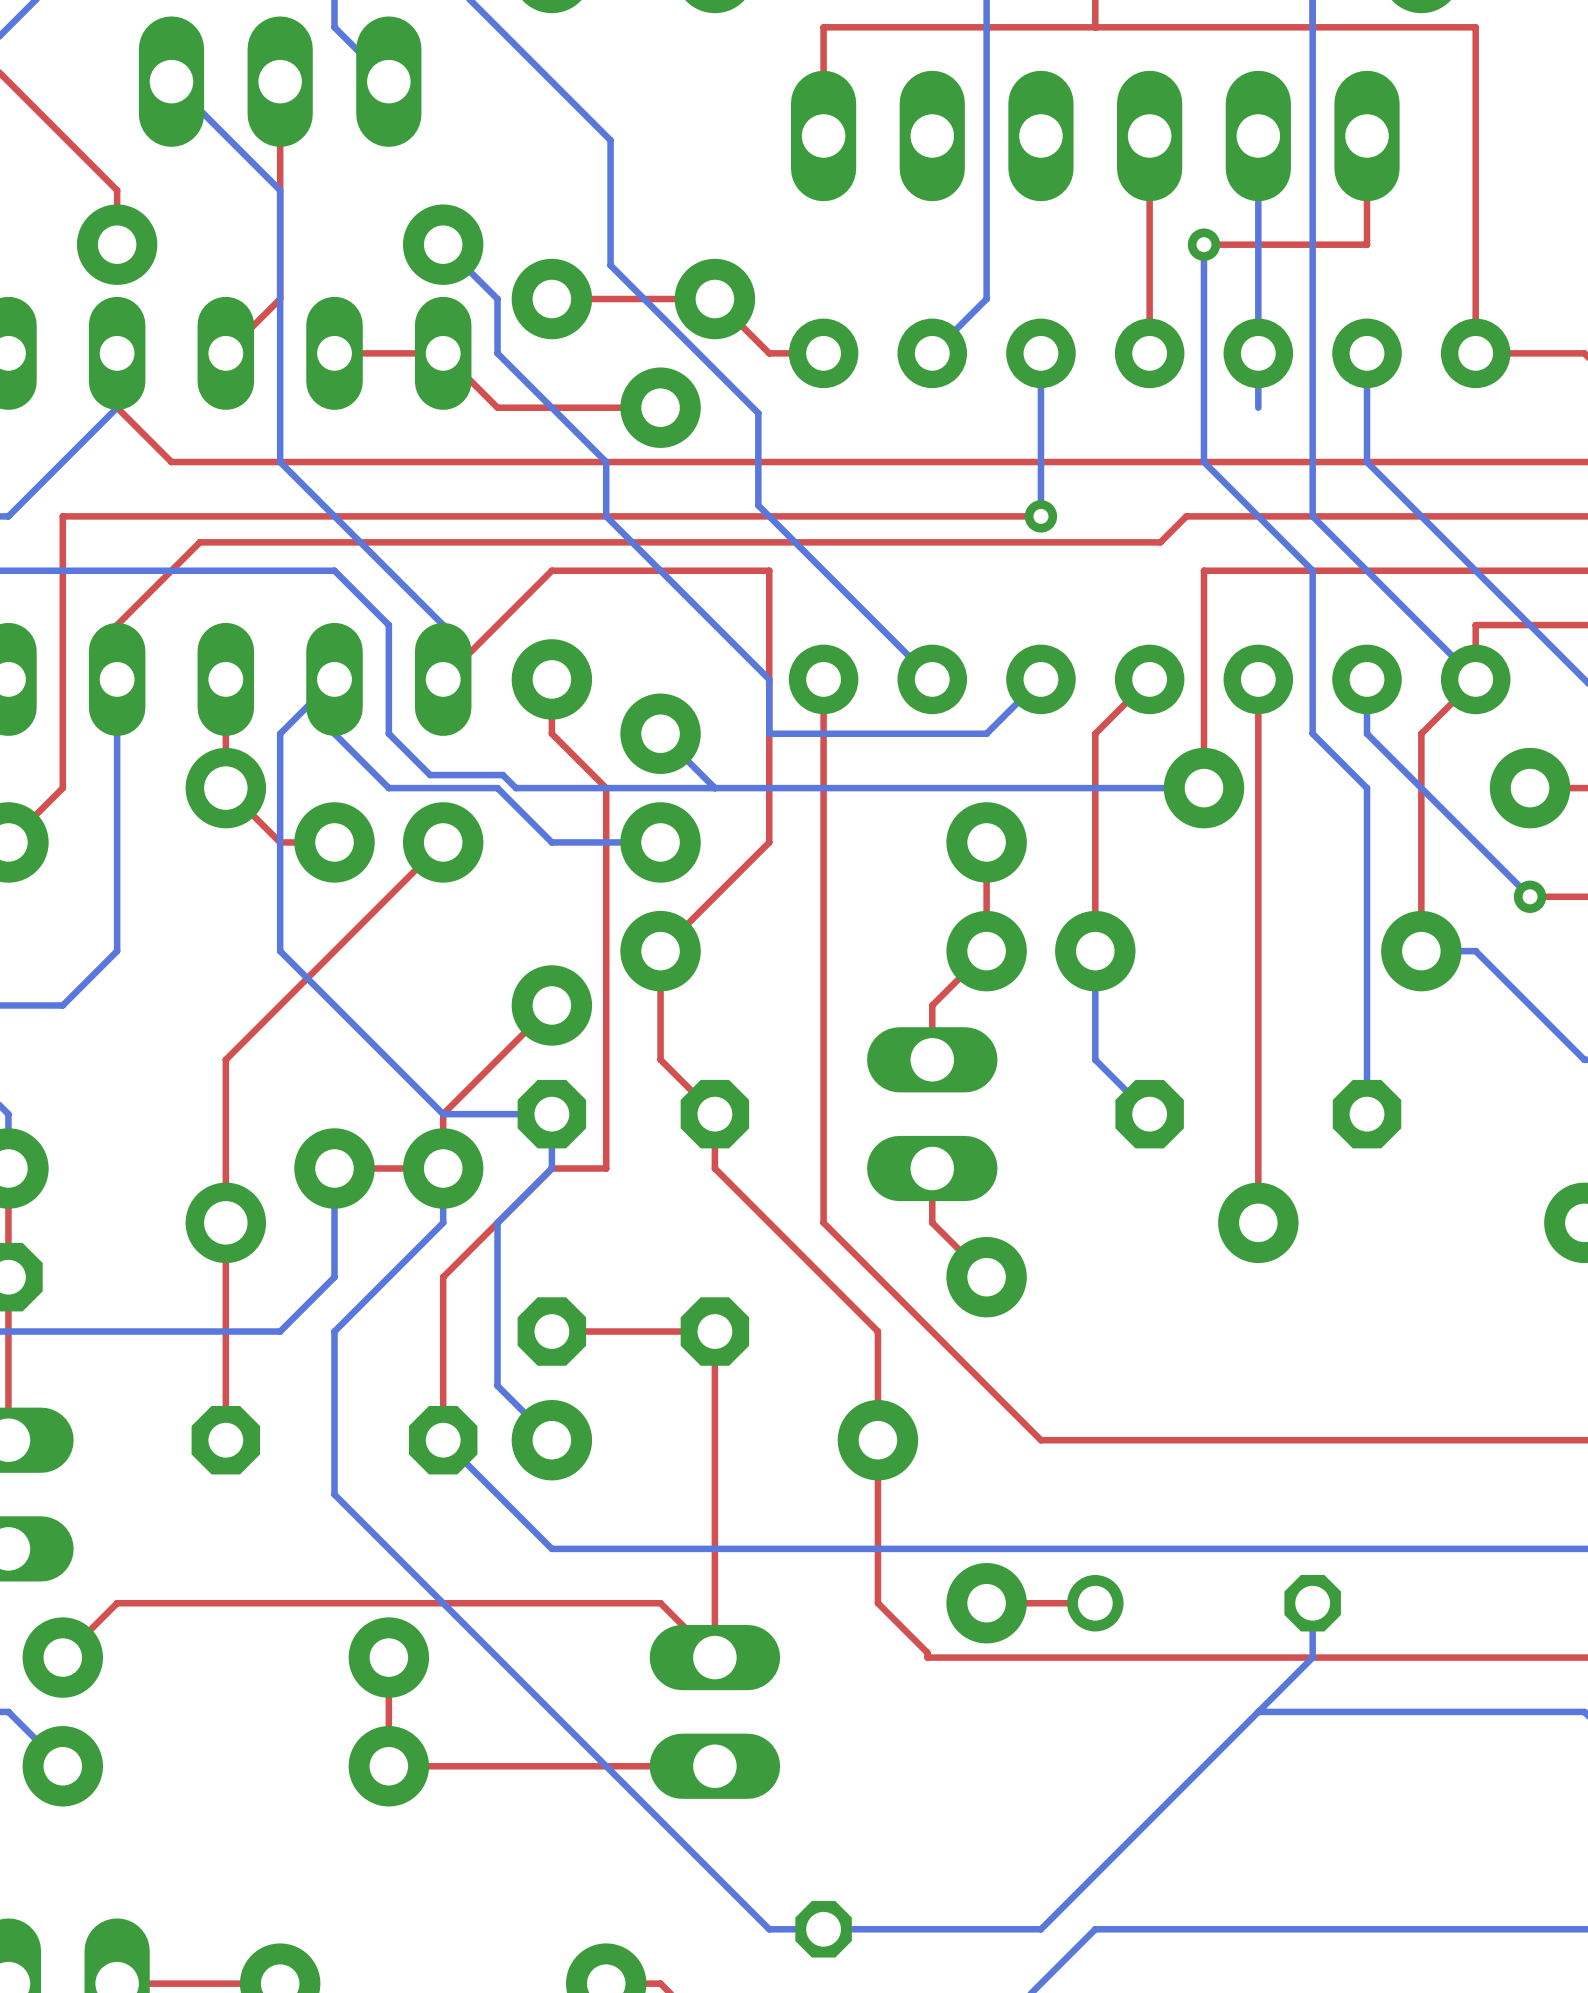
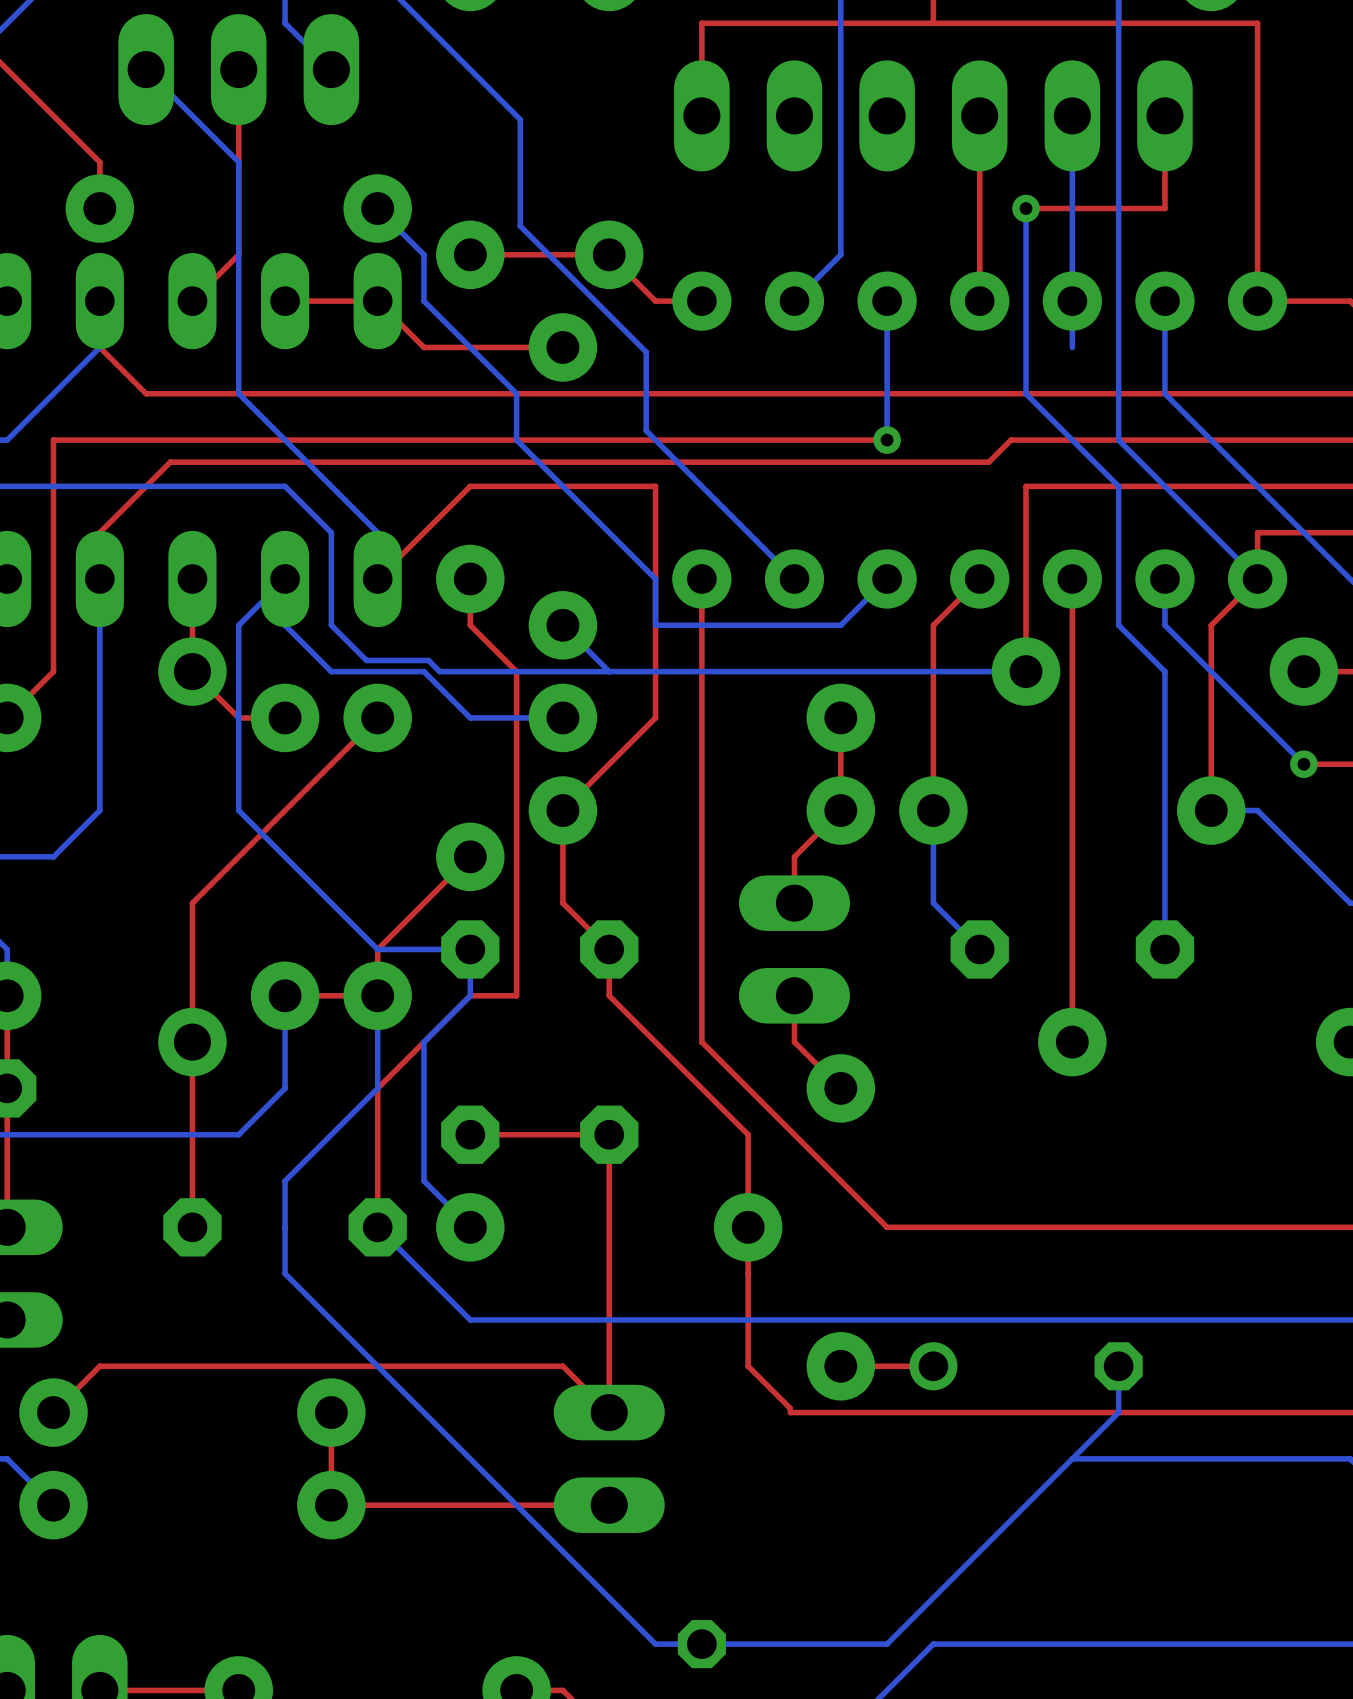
bottom track: (443, 1222) (334, 1331) (334, 1385) -> (377, 1042) (377, 1088) (285, 1181)

